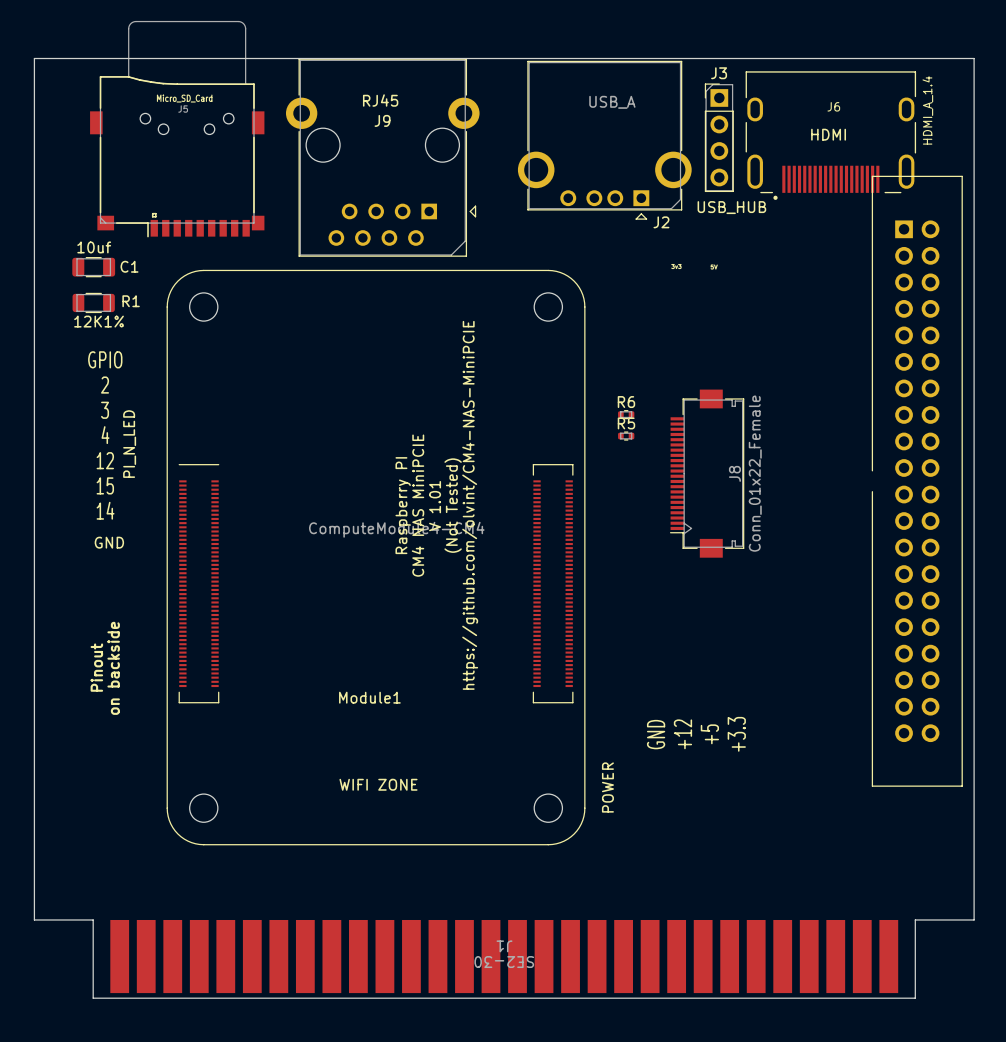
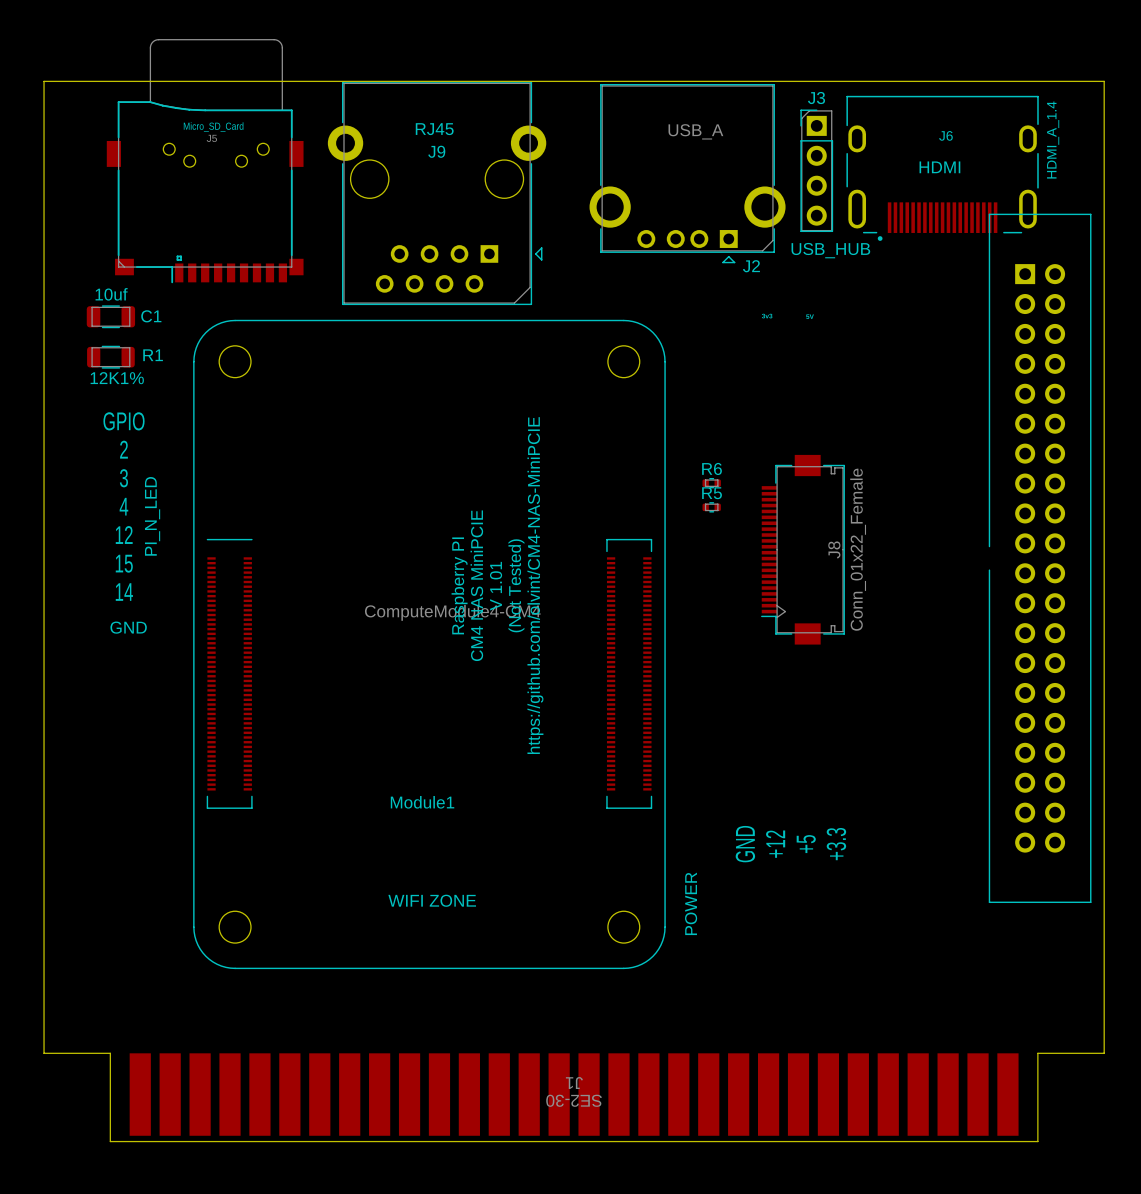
text: Pinout (96, 667) -> none
text: on backside (113, 668) -> none

